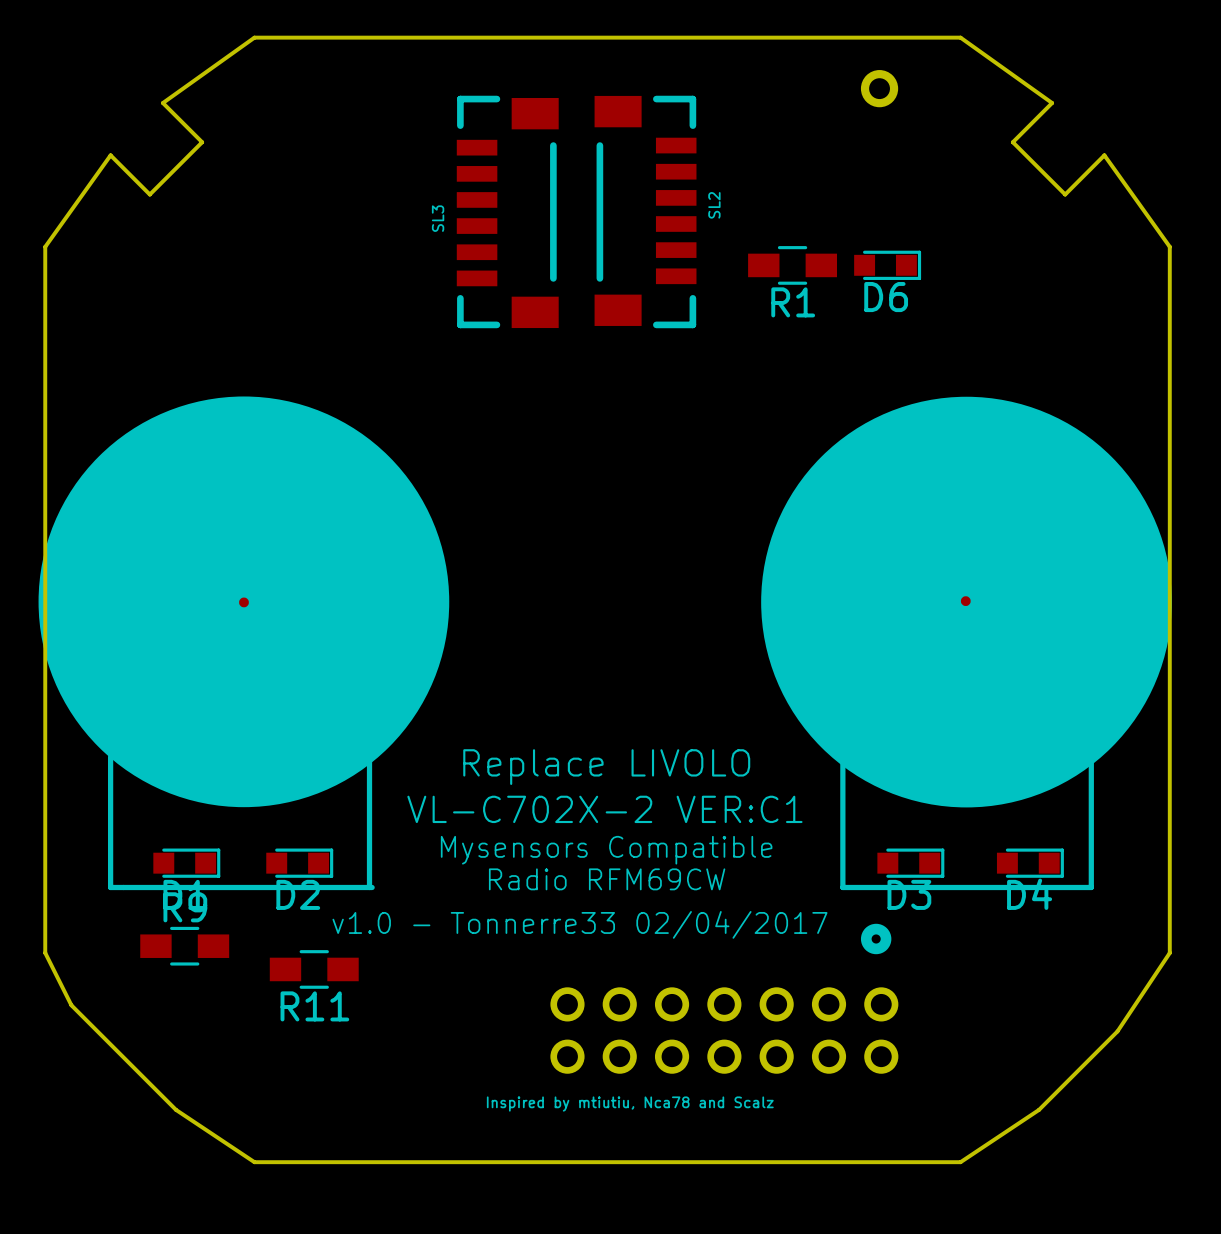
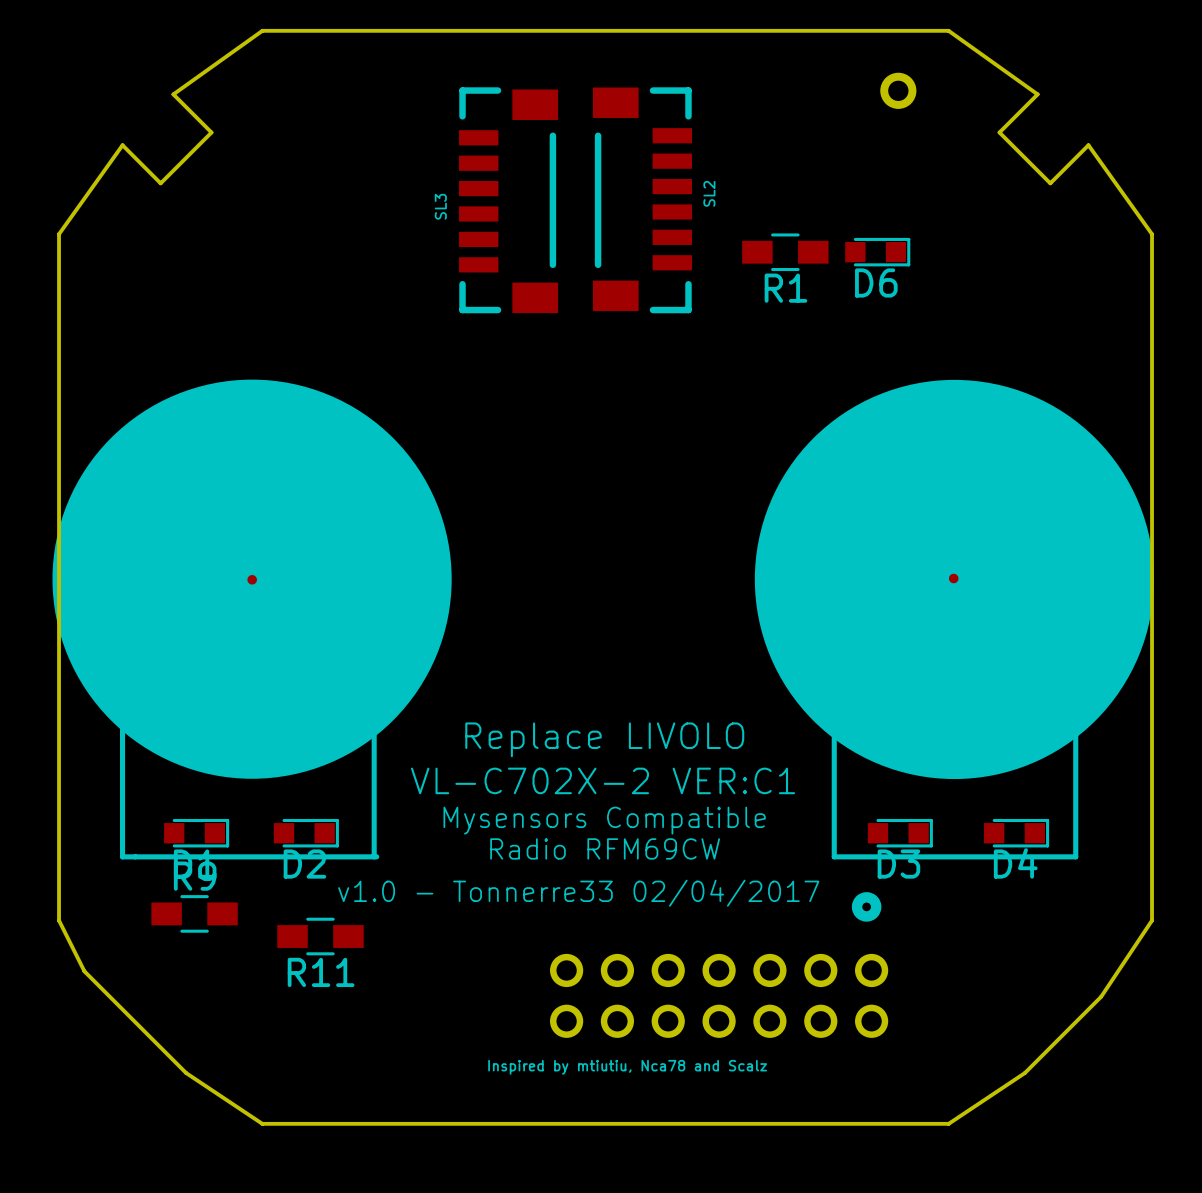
part position: (879, 88) -> (898, 90)

